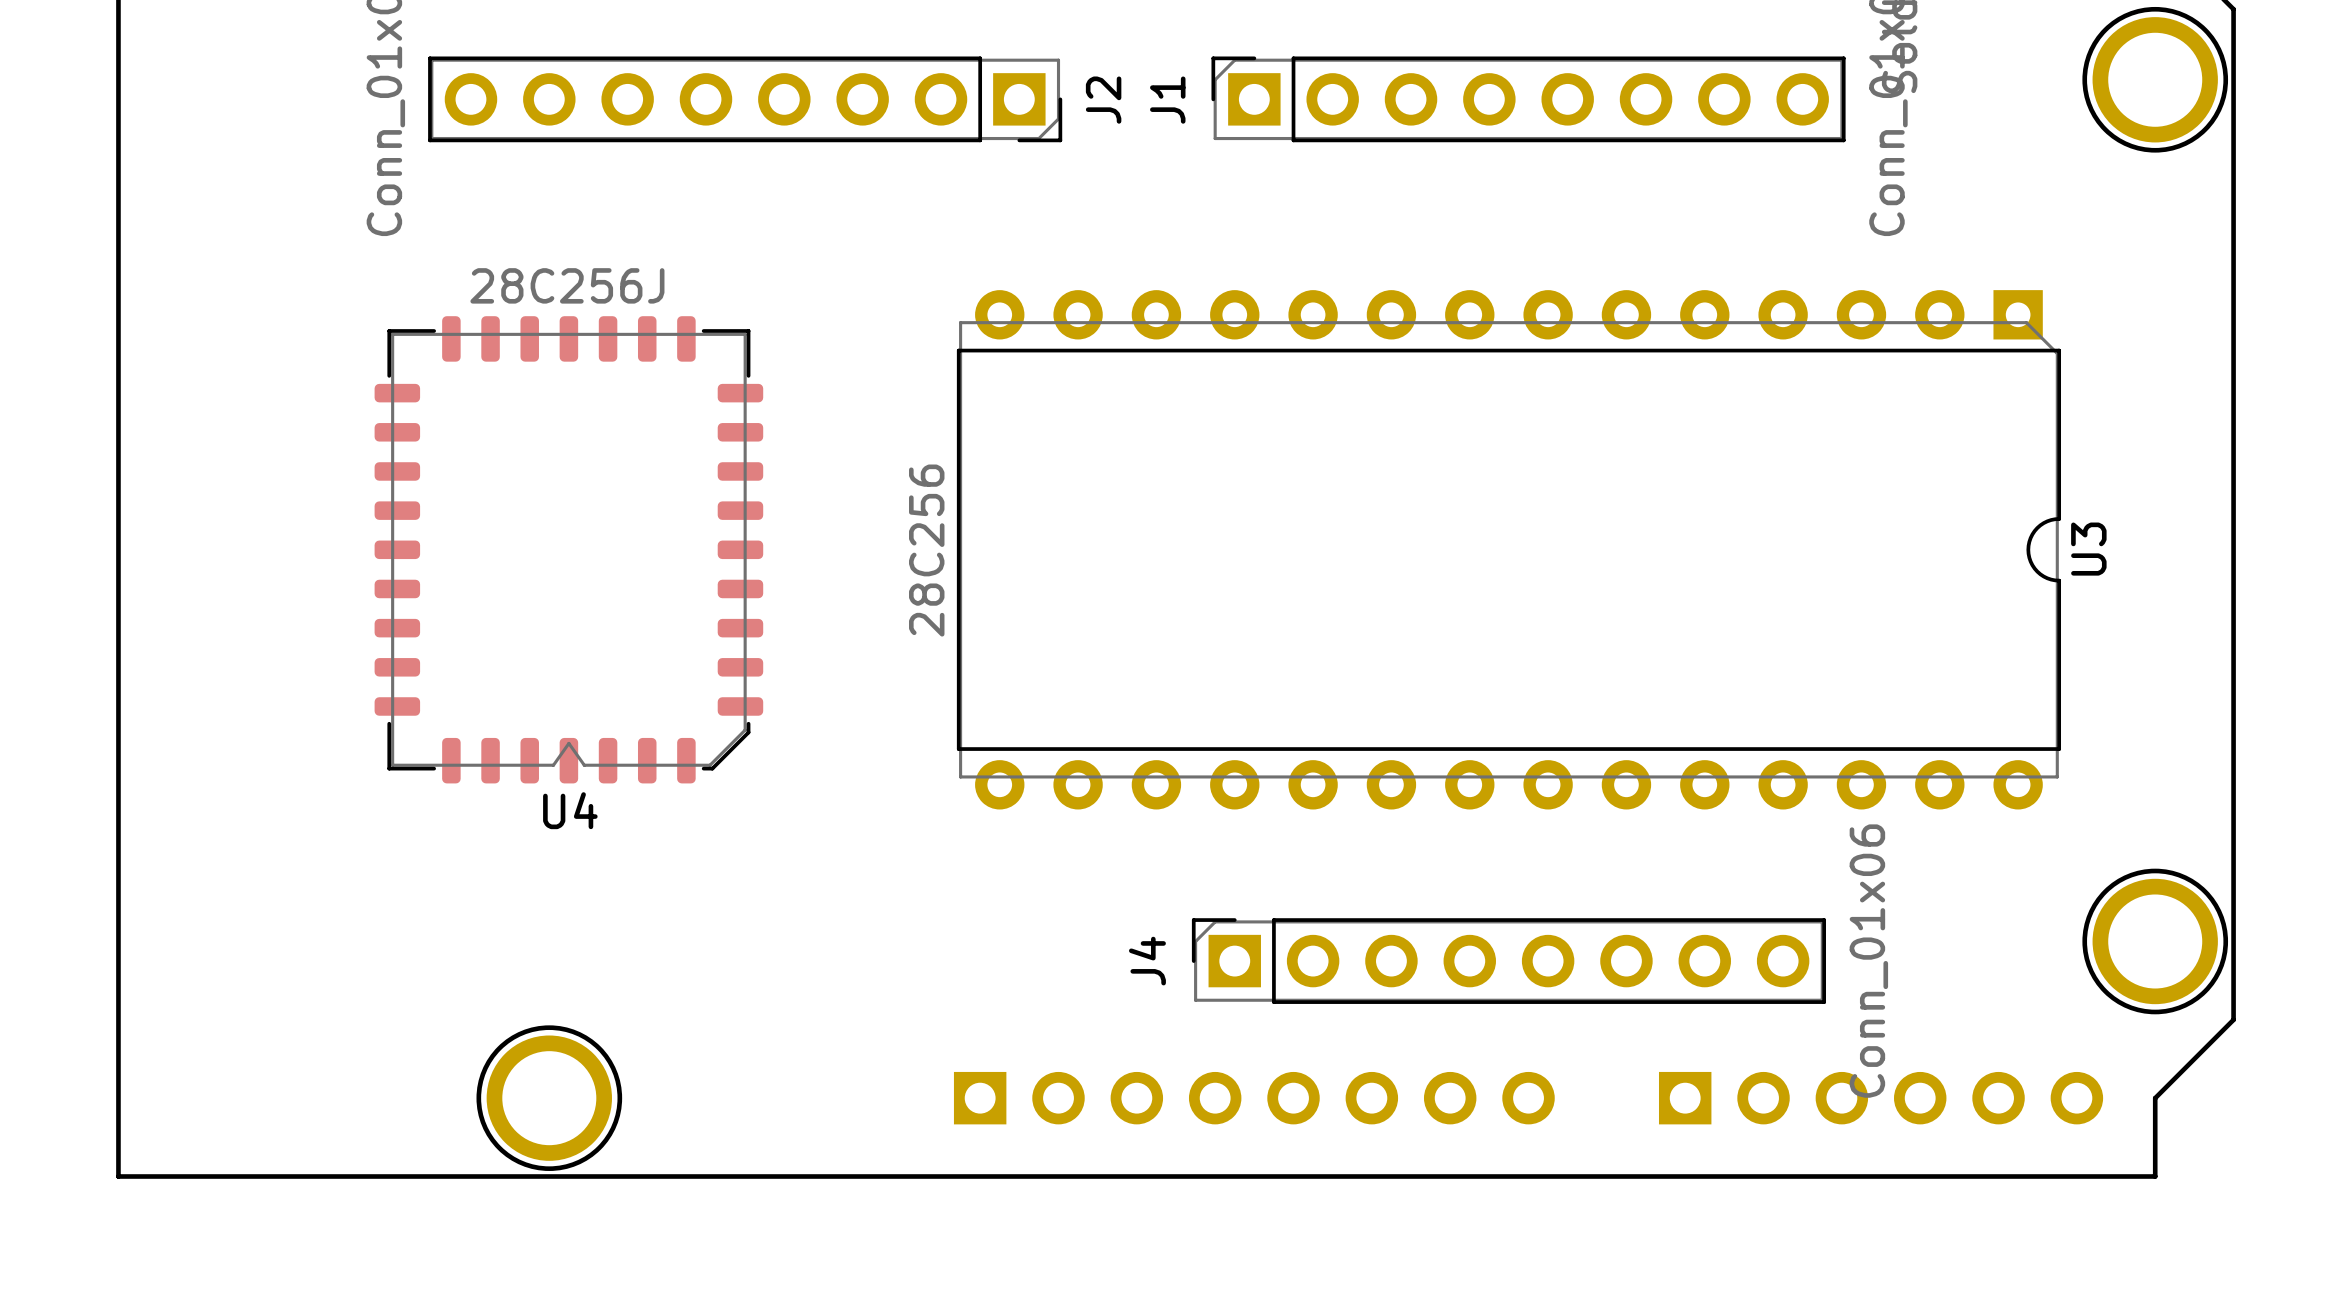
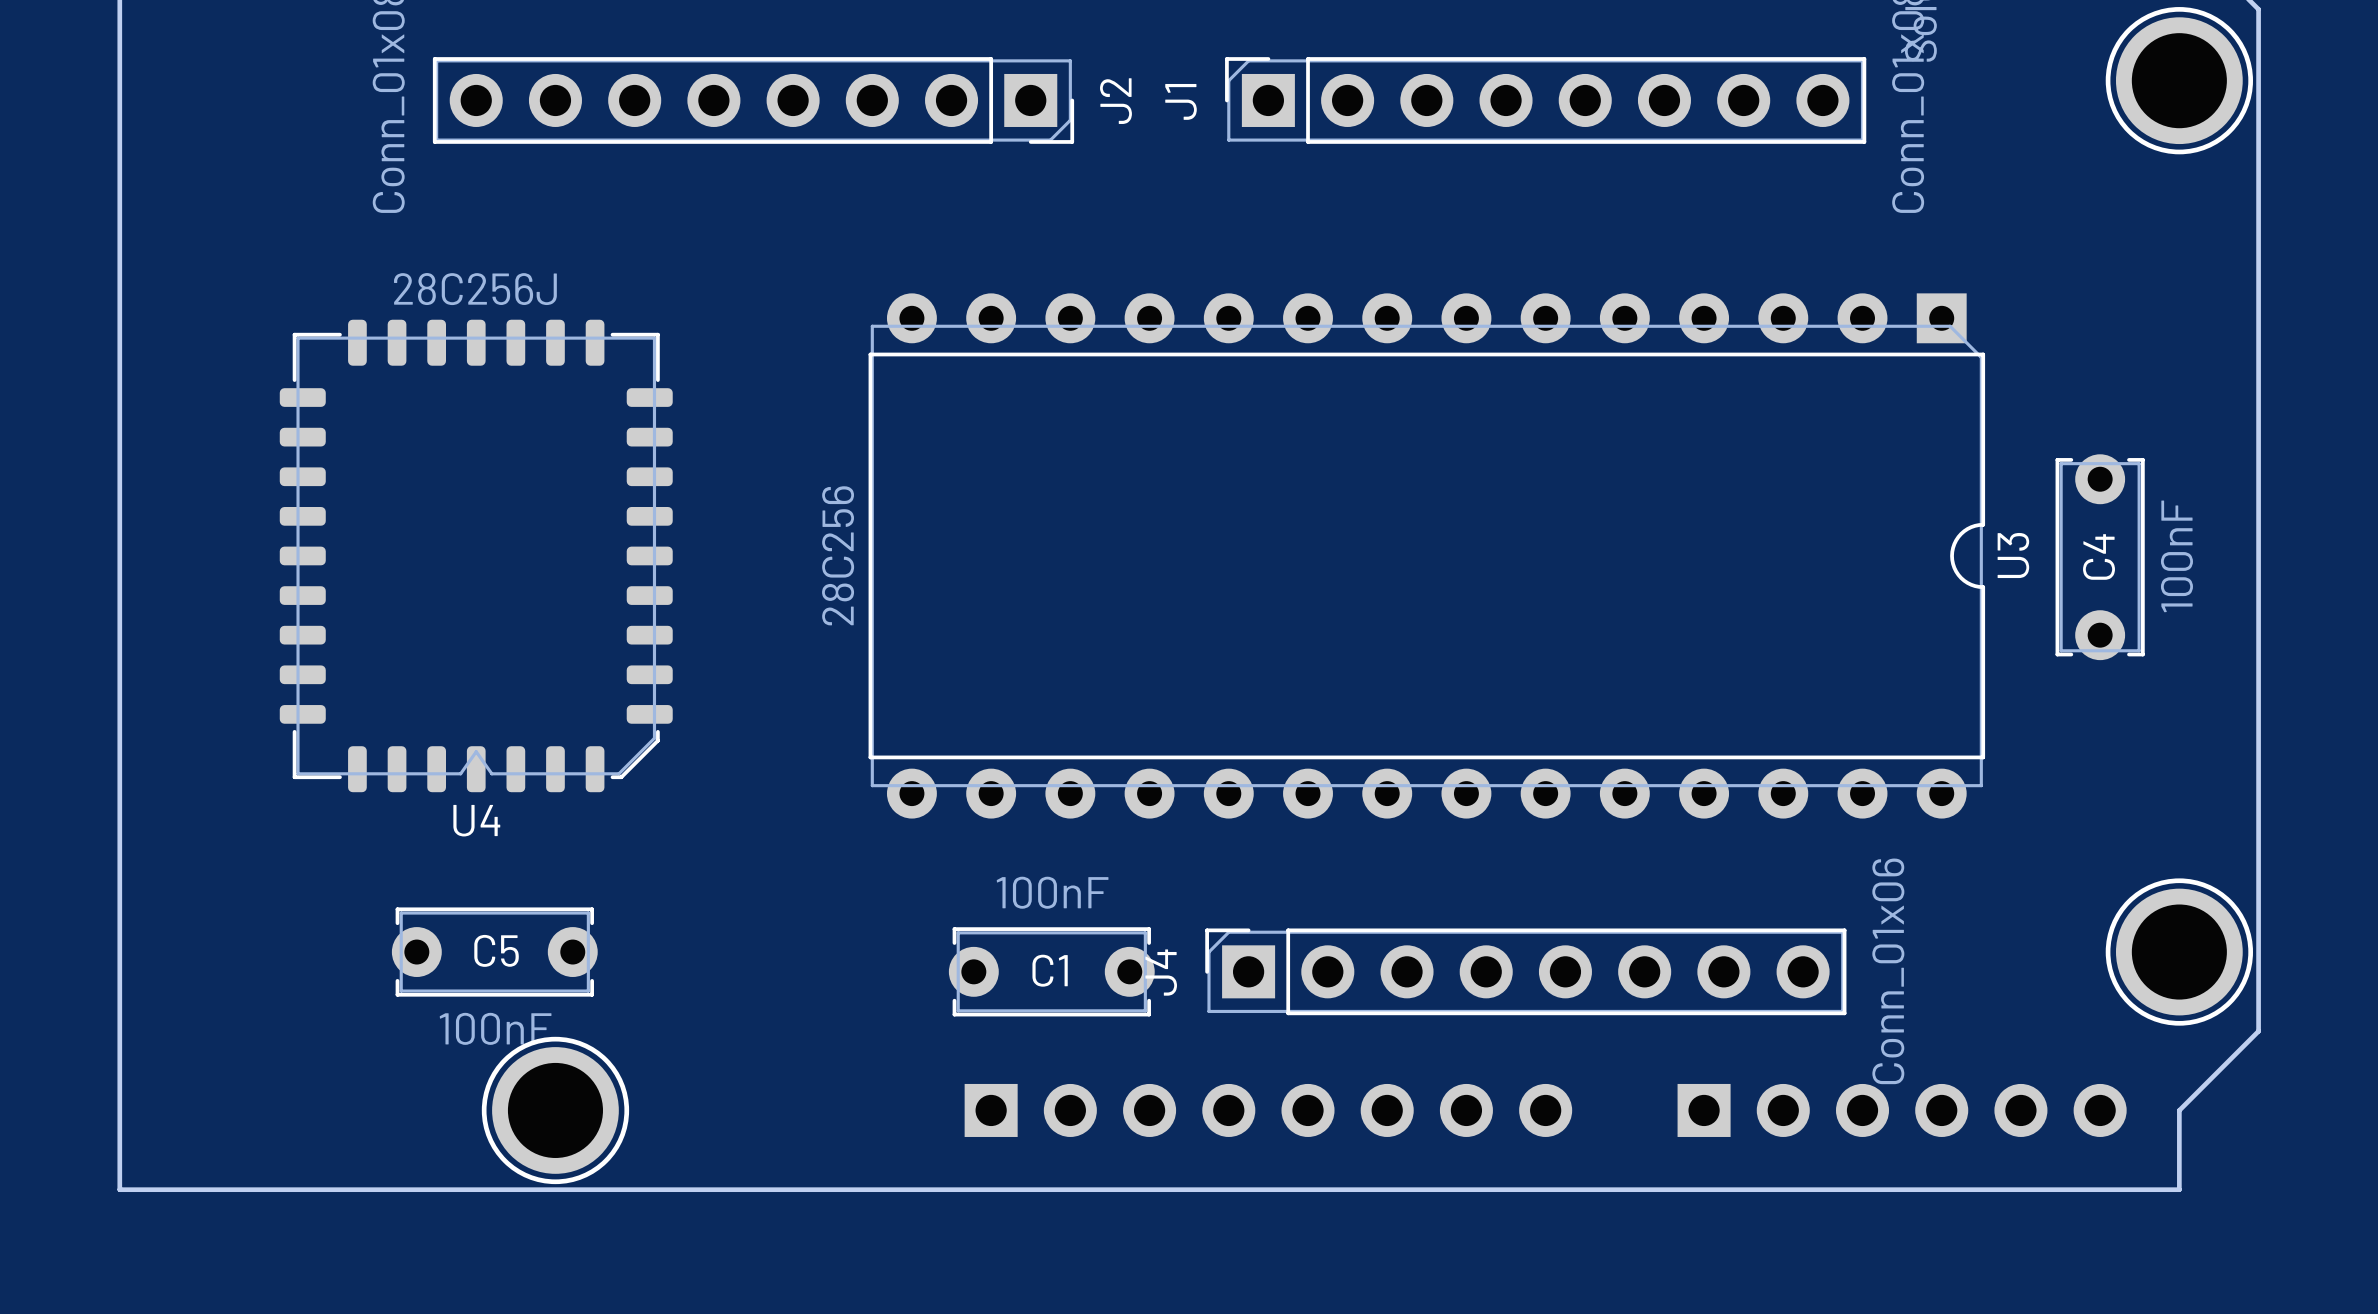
U4 position: (568, 549) -> (476, 555)
U3 position: (1508, 549) -> (1426, 555)
C4: none -> 100nF (2100, 557)
C5: none -> 100nF (494, 952)
C1: none -> 100nF (1051, 971)

